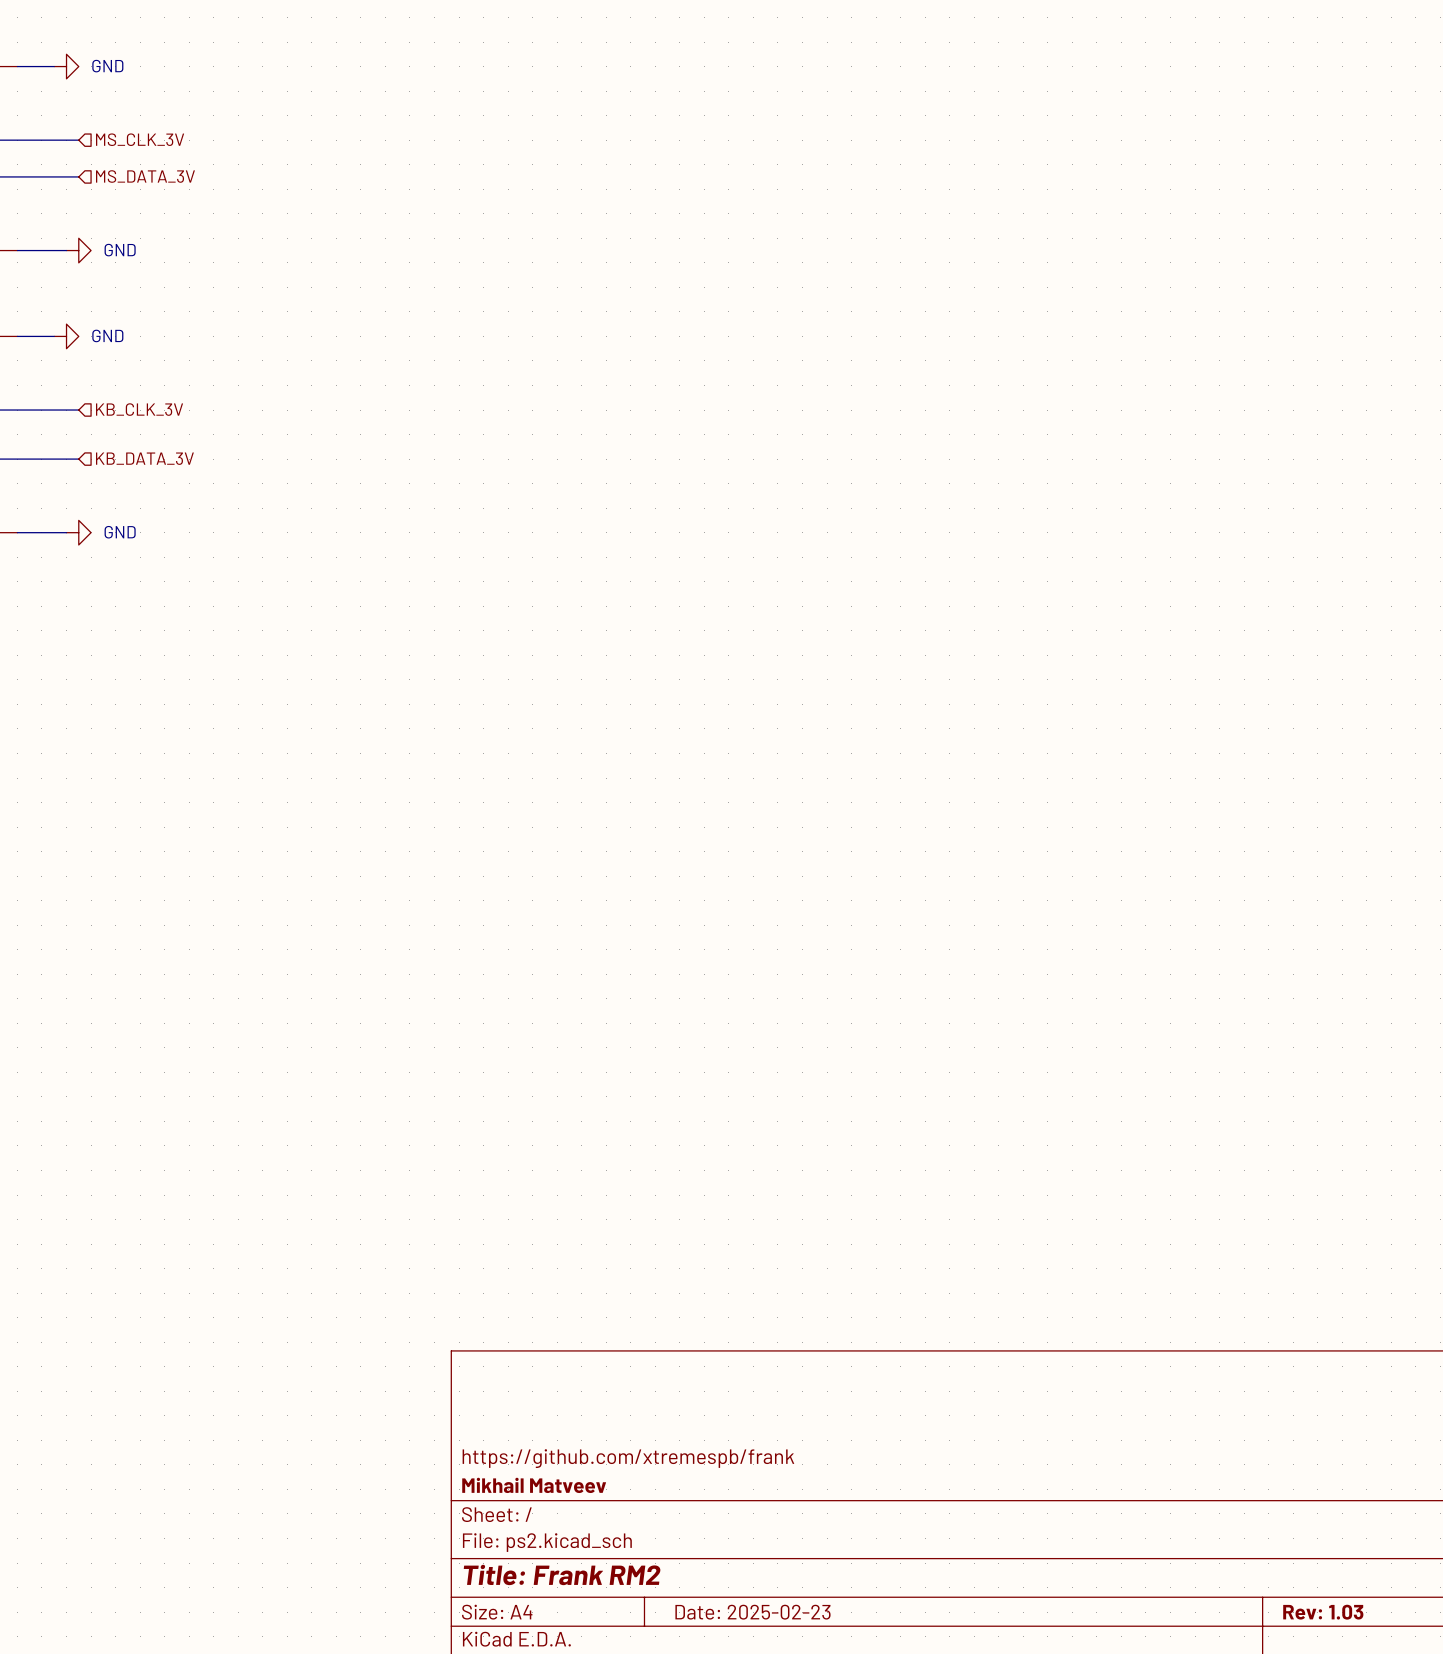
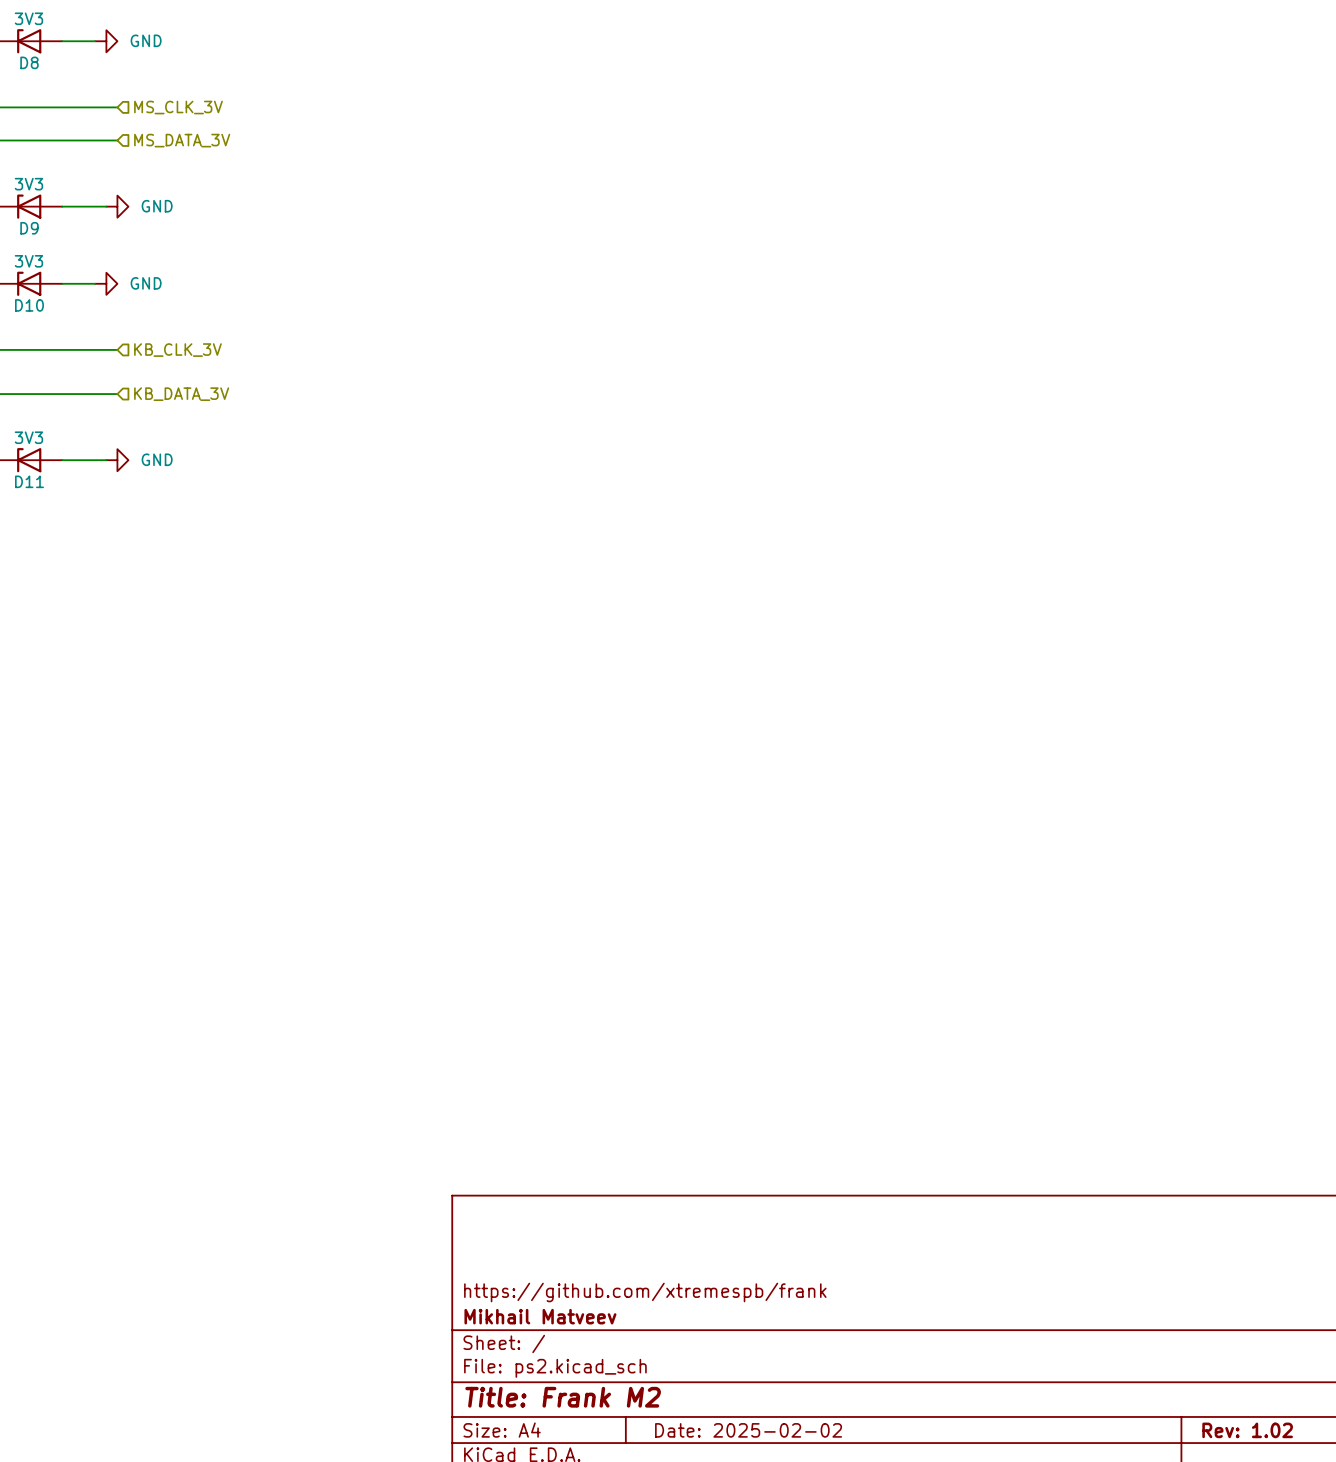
title block: Title: Frank RM2 (562, 1574) -> Title: Frank M2 (563, 1397)
title block: Date: 2025-02-23 (752, 1612) -> Date: 2025-02-02 (748, 1430)
title block: Rev: 1.03 (1323, 1612) -> Rev: 1.02 (1247, 1430)

